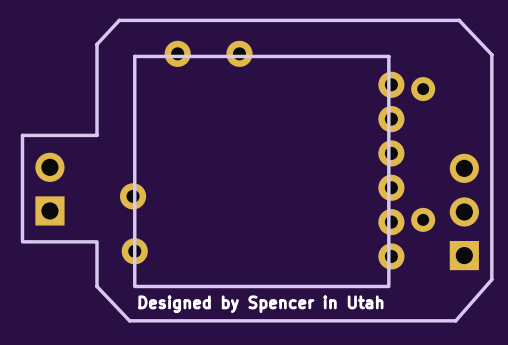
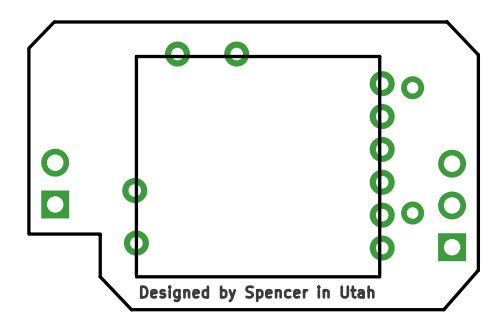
board edge: none -> (54, 21) (28, 48)
board edge: (119, 20) (96, 44) (96, 135) (22, 135) -> (28, 49) (28, 132)
board edge: none -> (121, 21) (55, 21)

